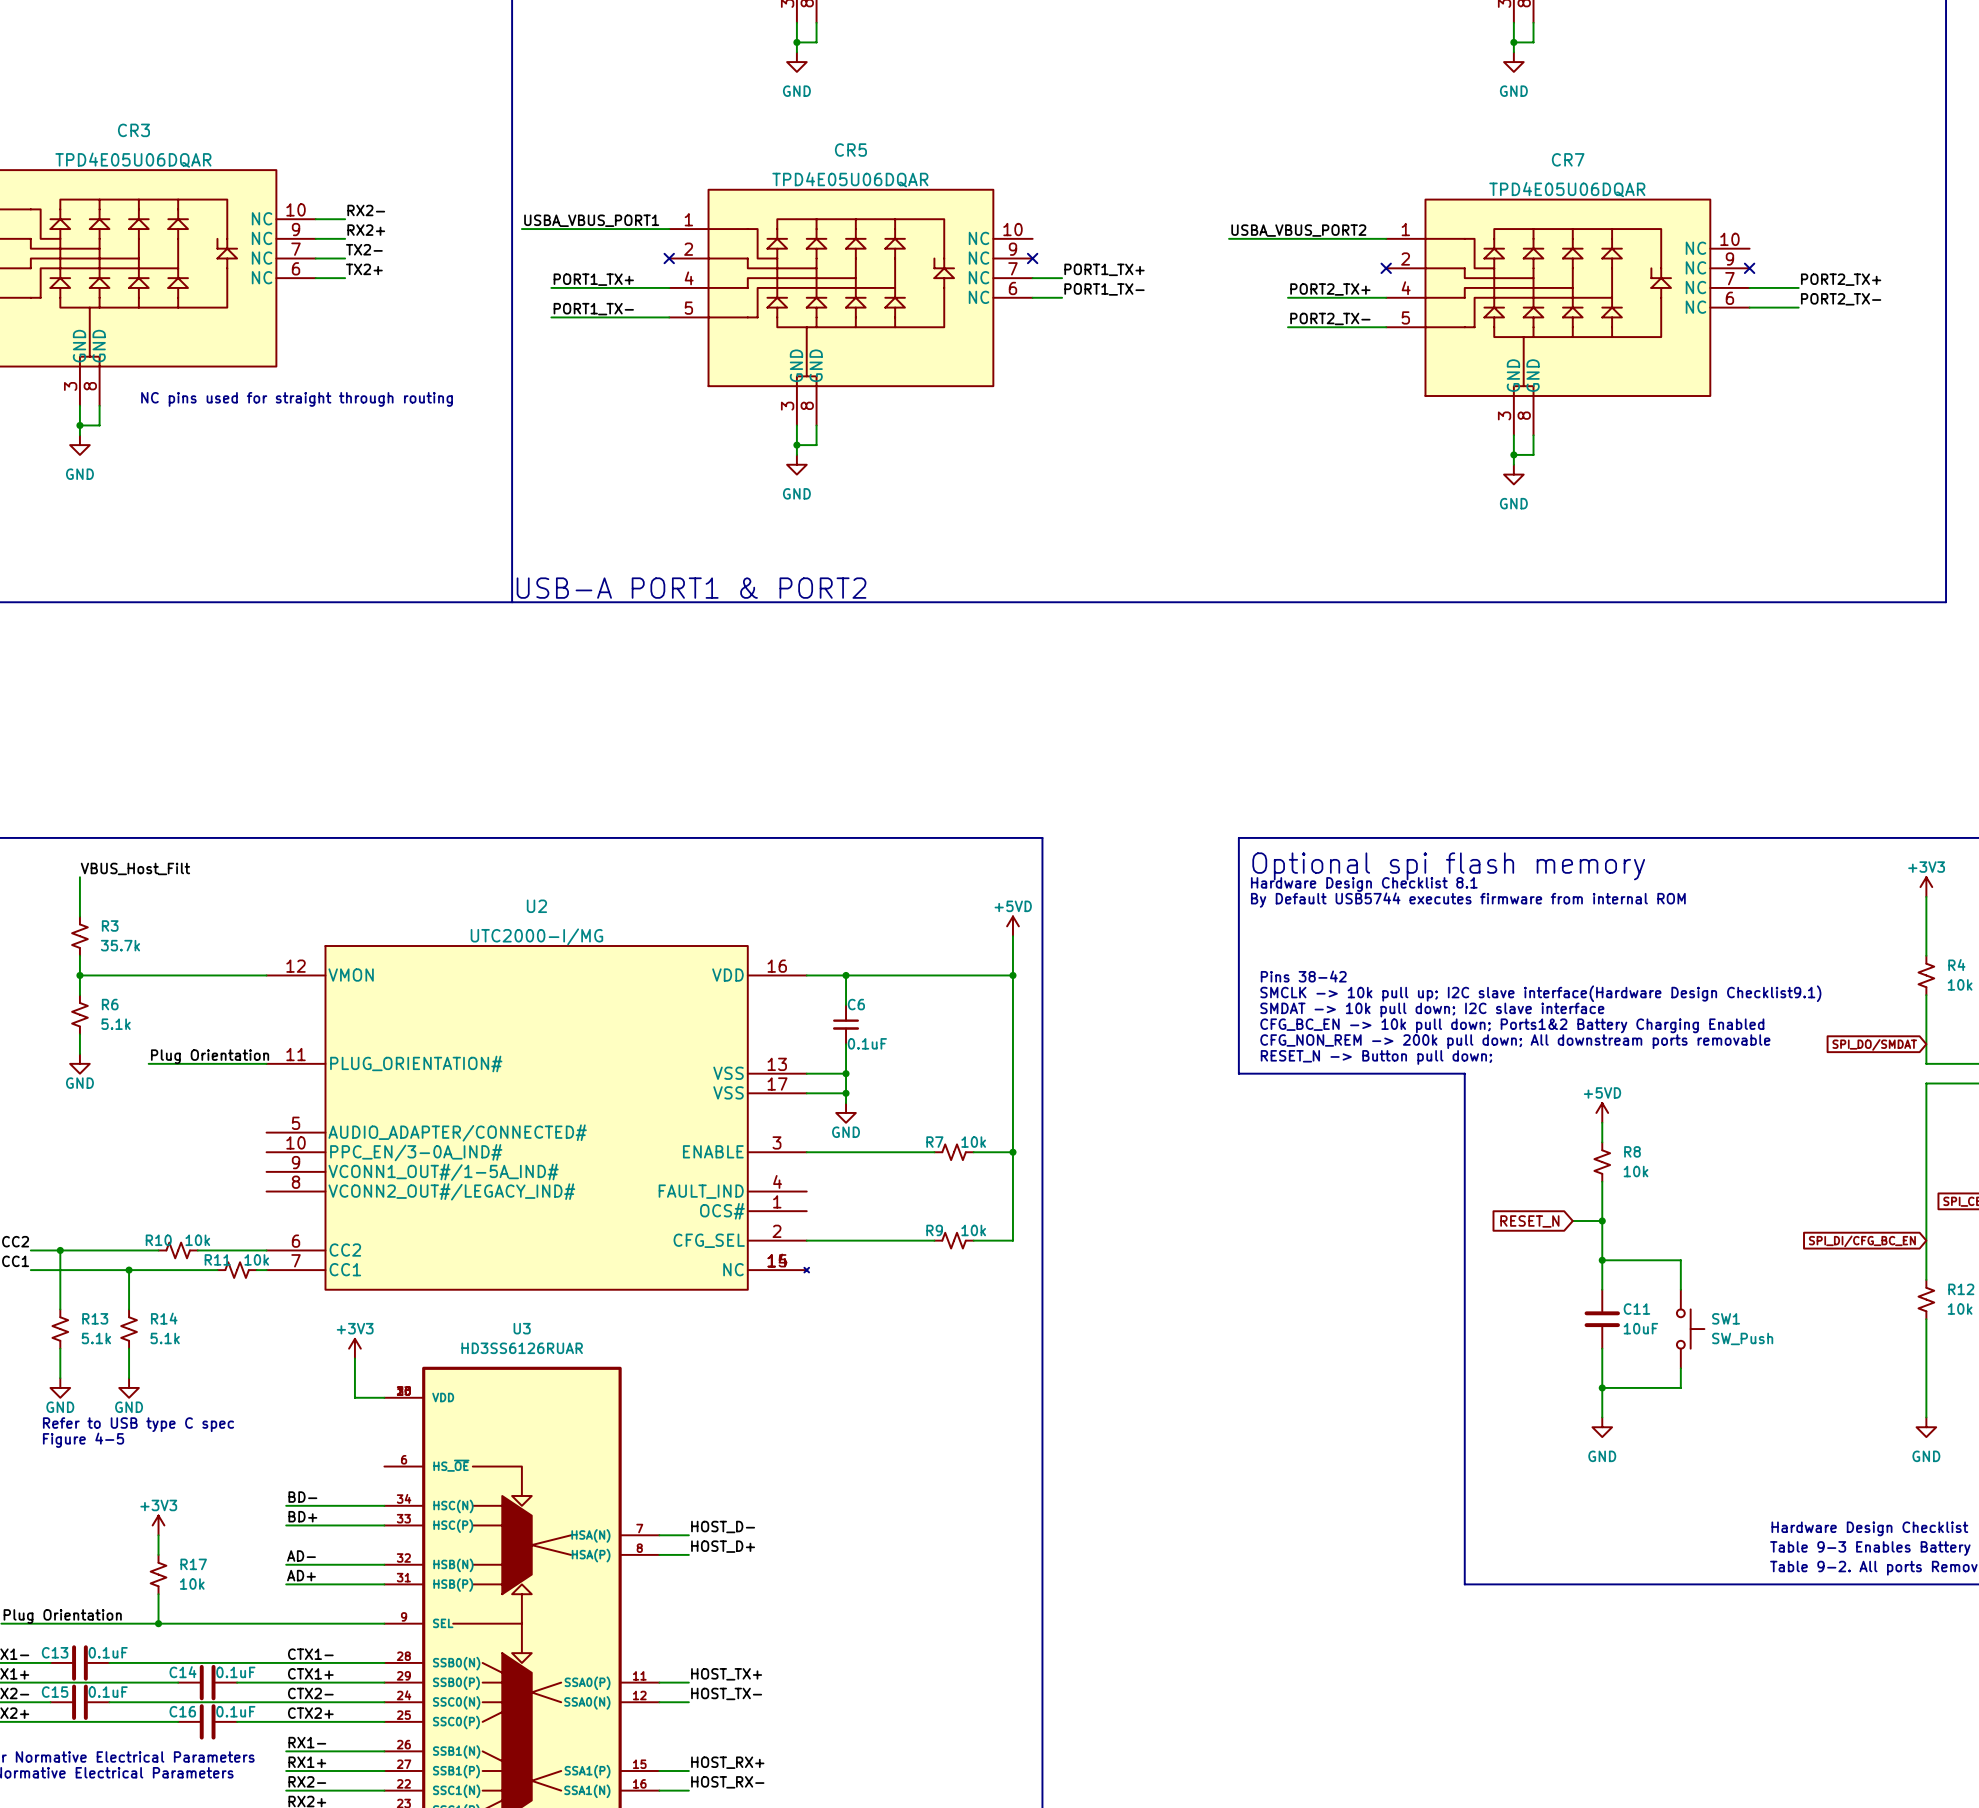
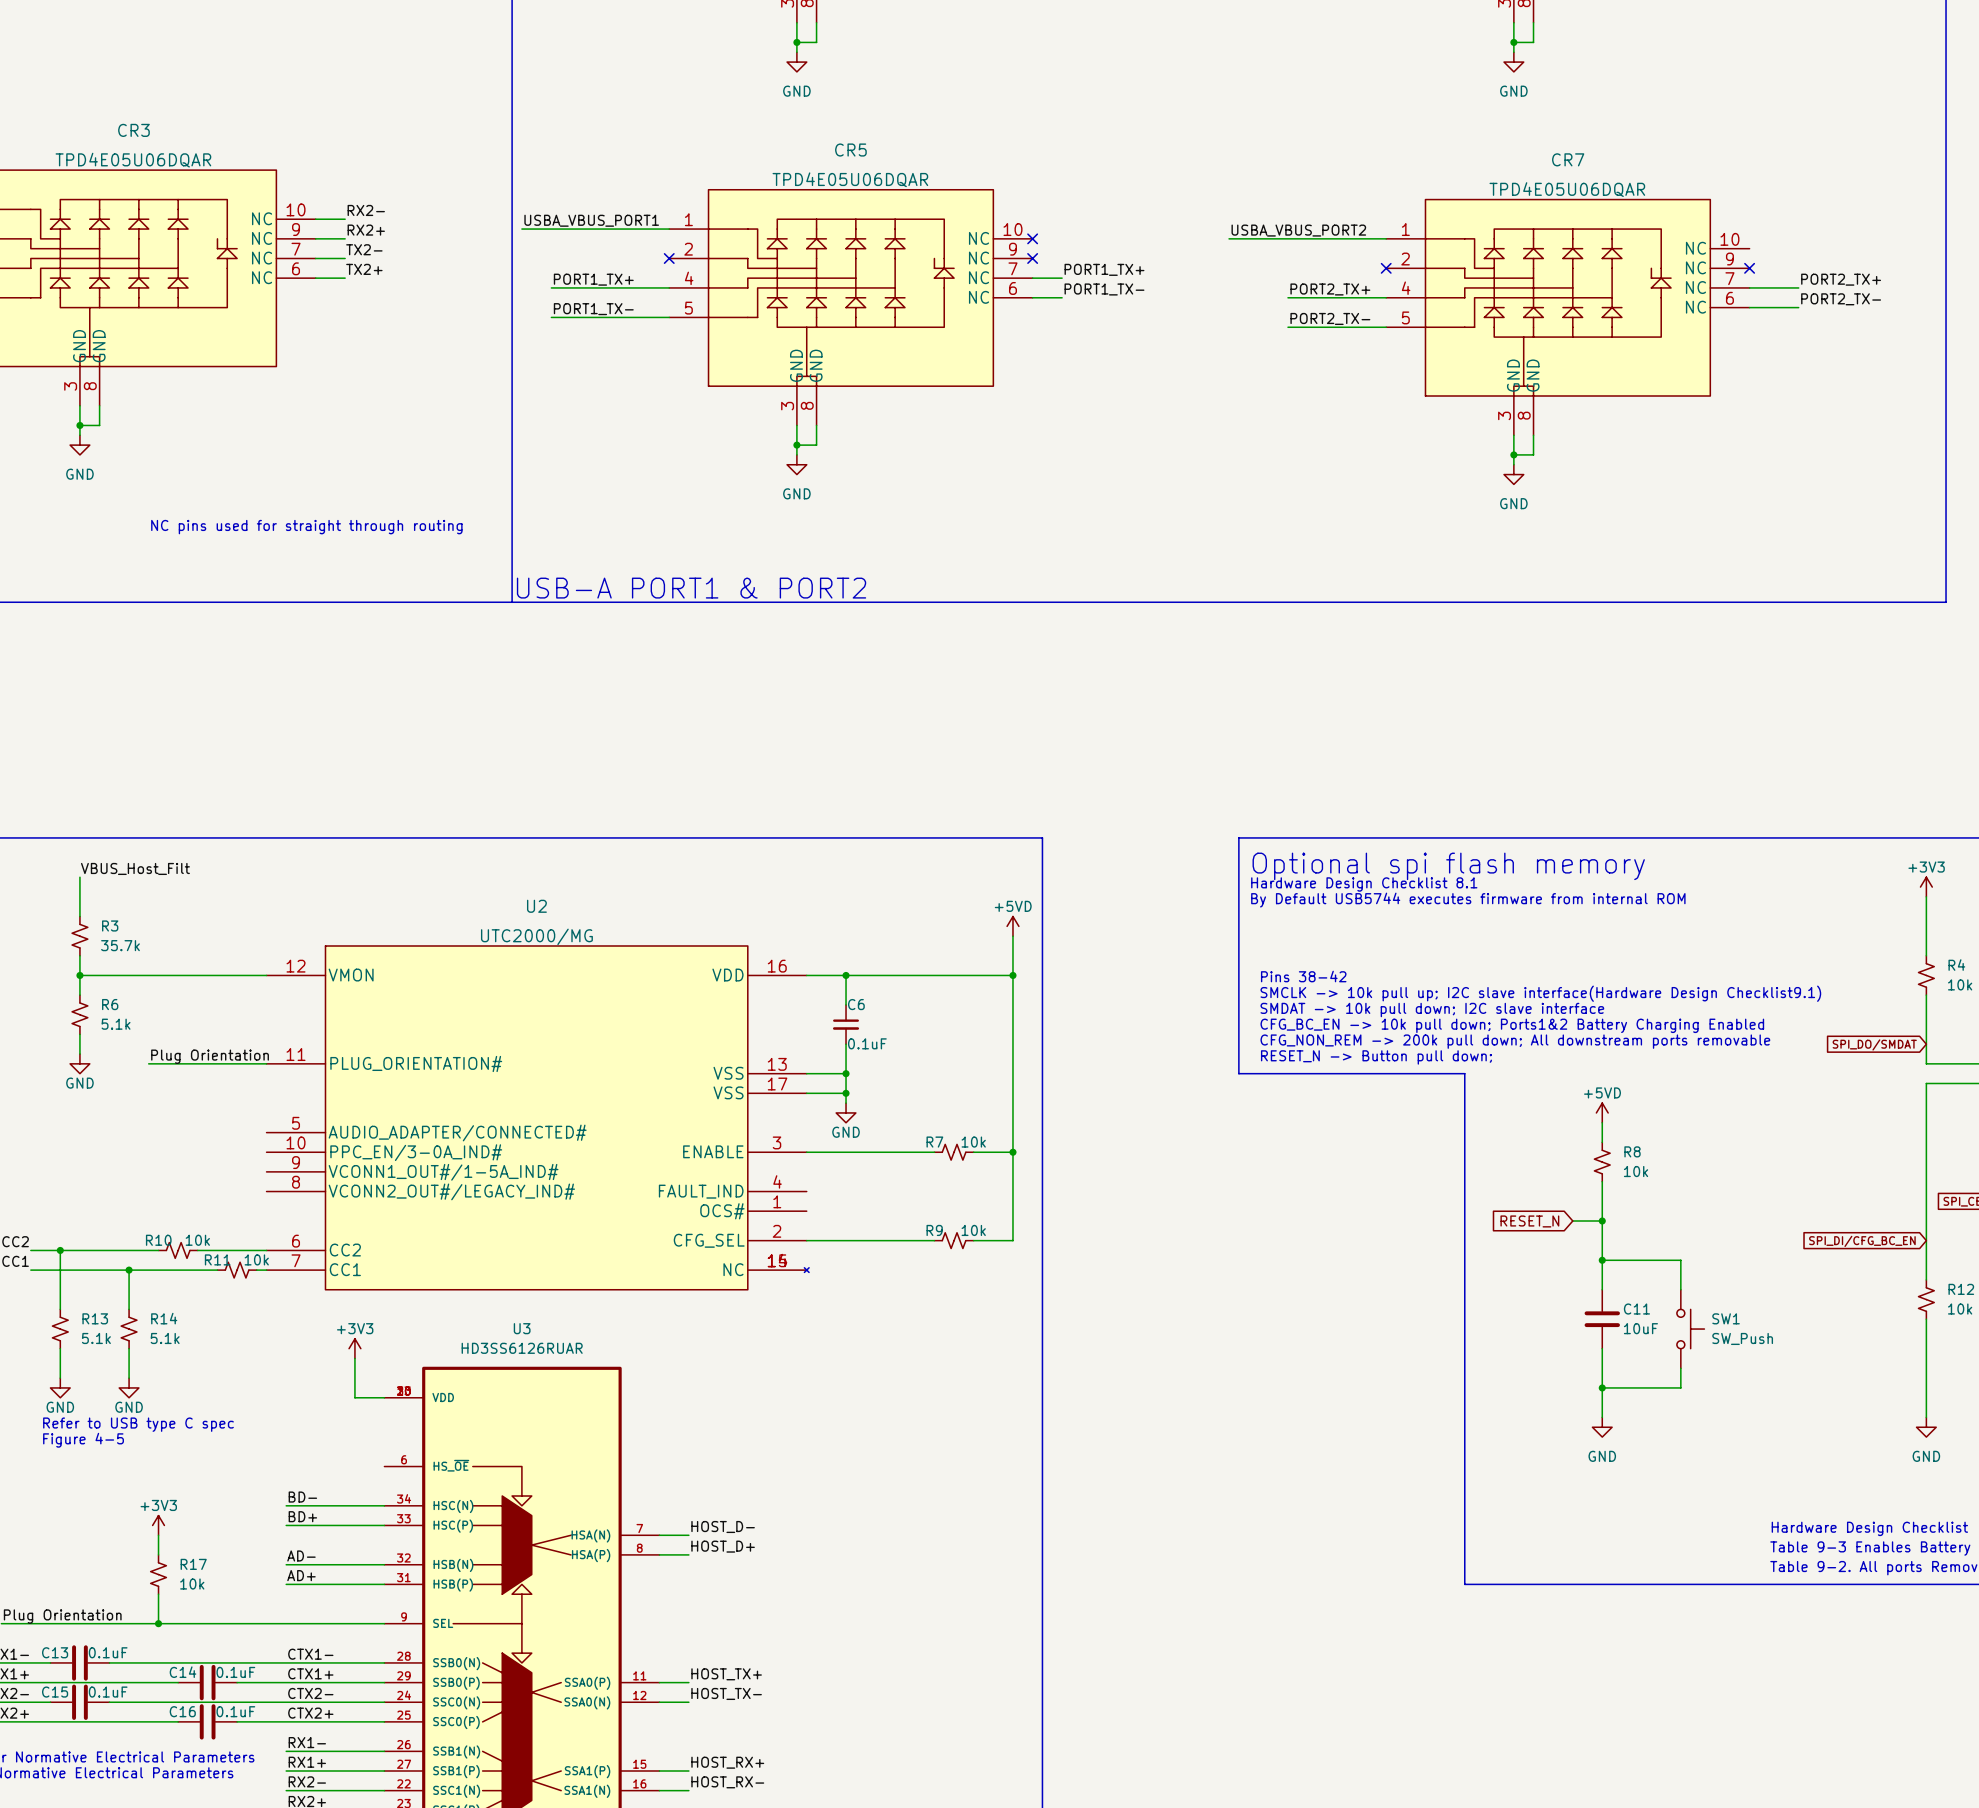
no-connect mark: none -> (1032, 238)
text position: NC pins used for straight through routing (297, 399) -> NC pins used for straight through routing (306, 527)
U2 value: UTC2000-I/MG (536, 936) -> UTC2000/MG (536, 936)

